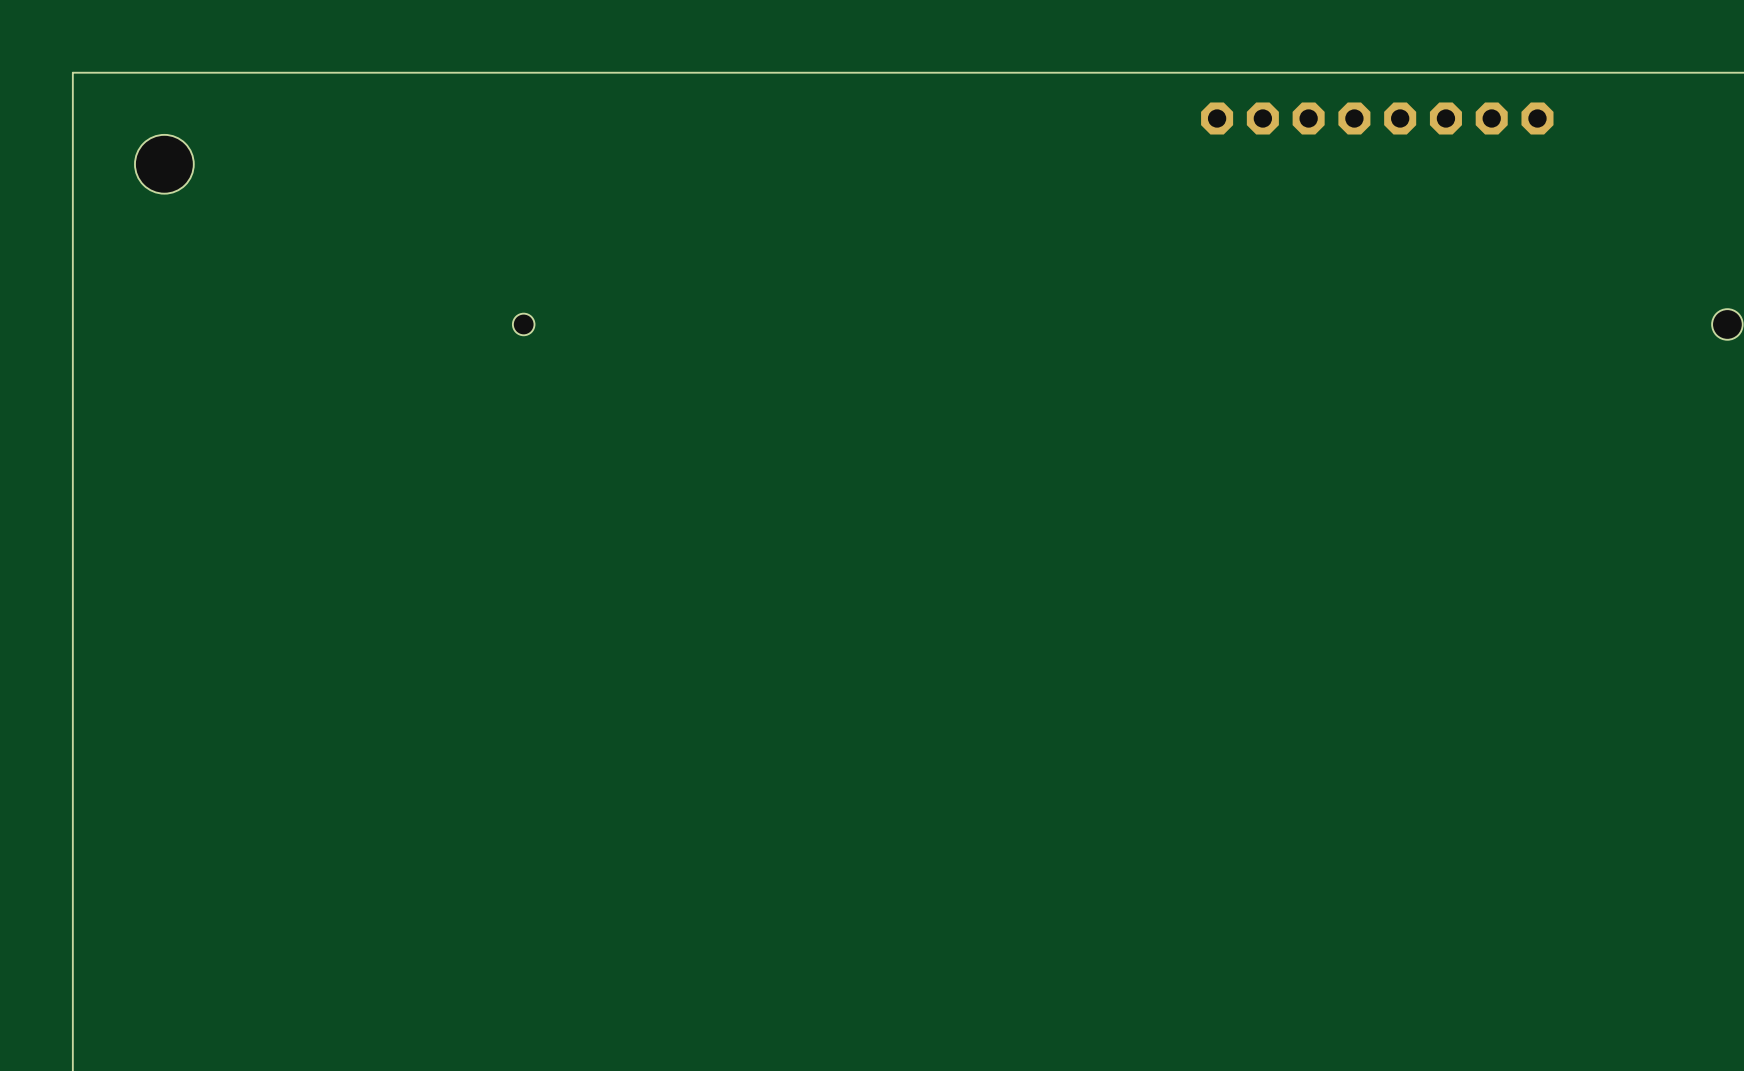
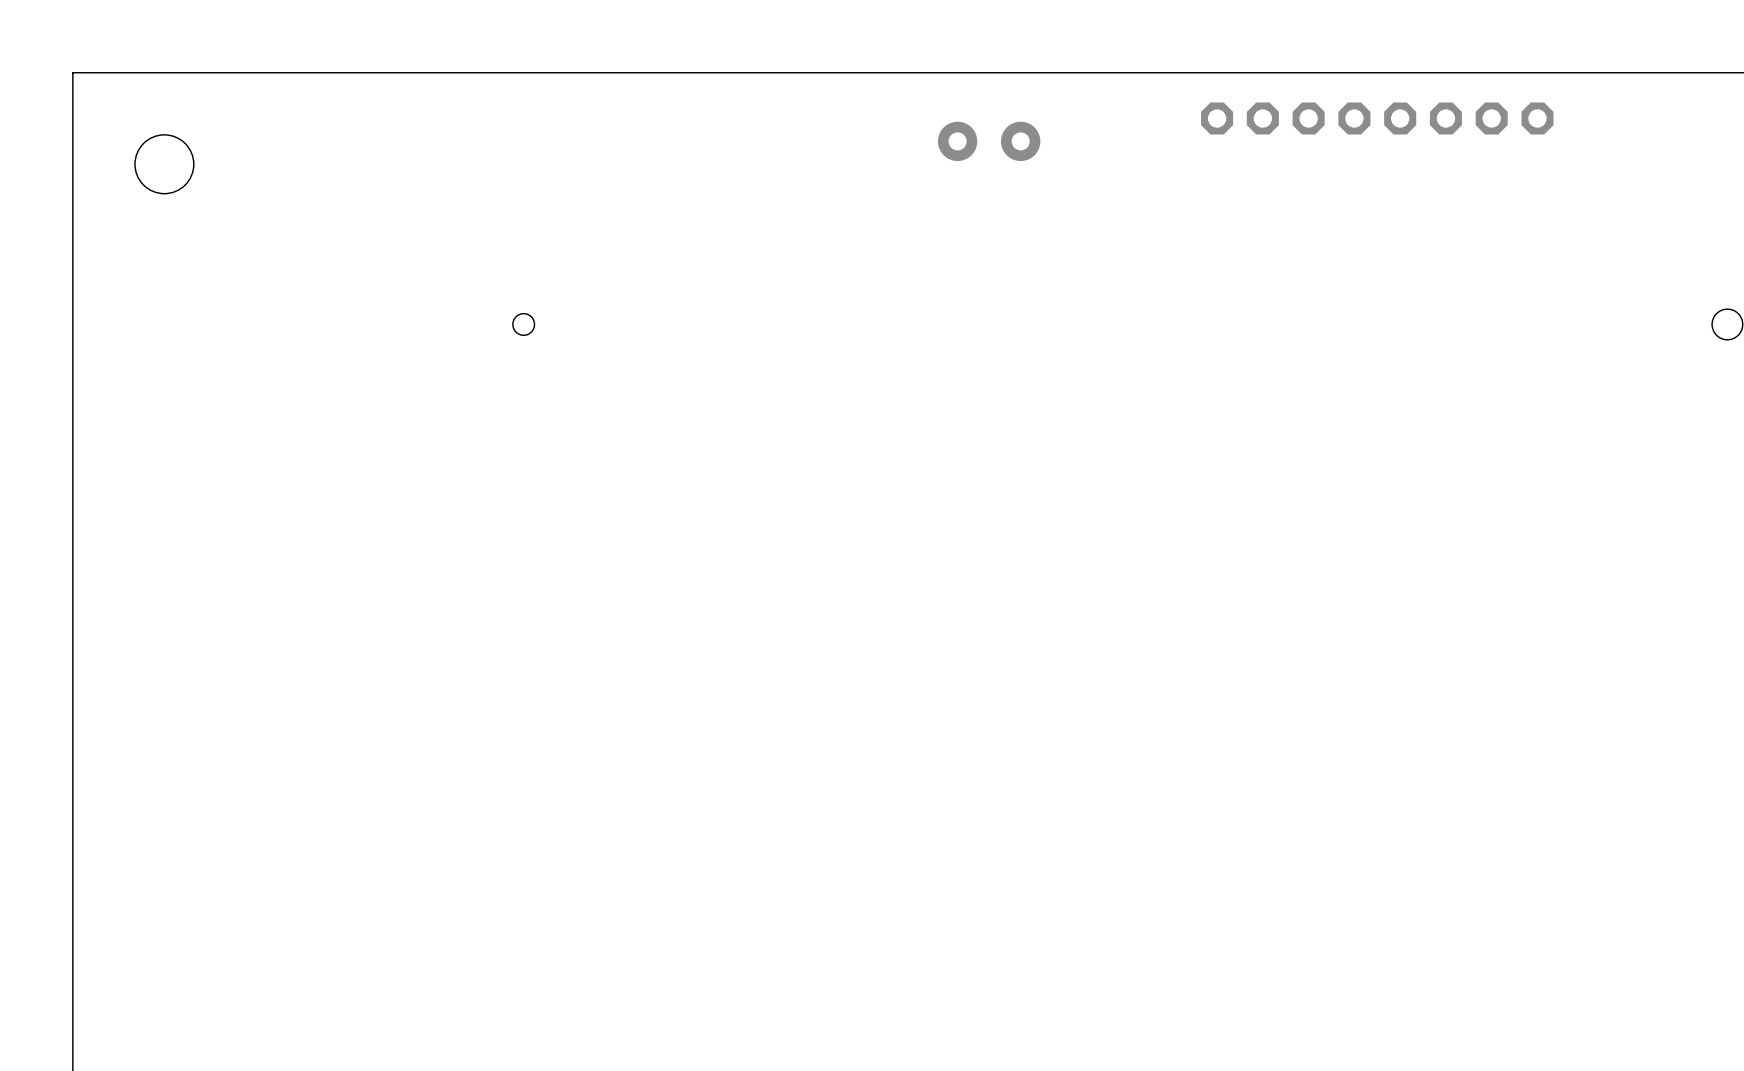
part: none -> (989, 141)

